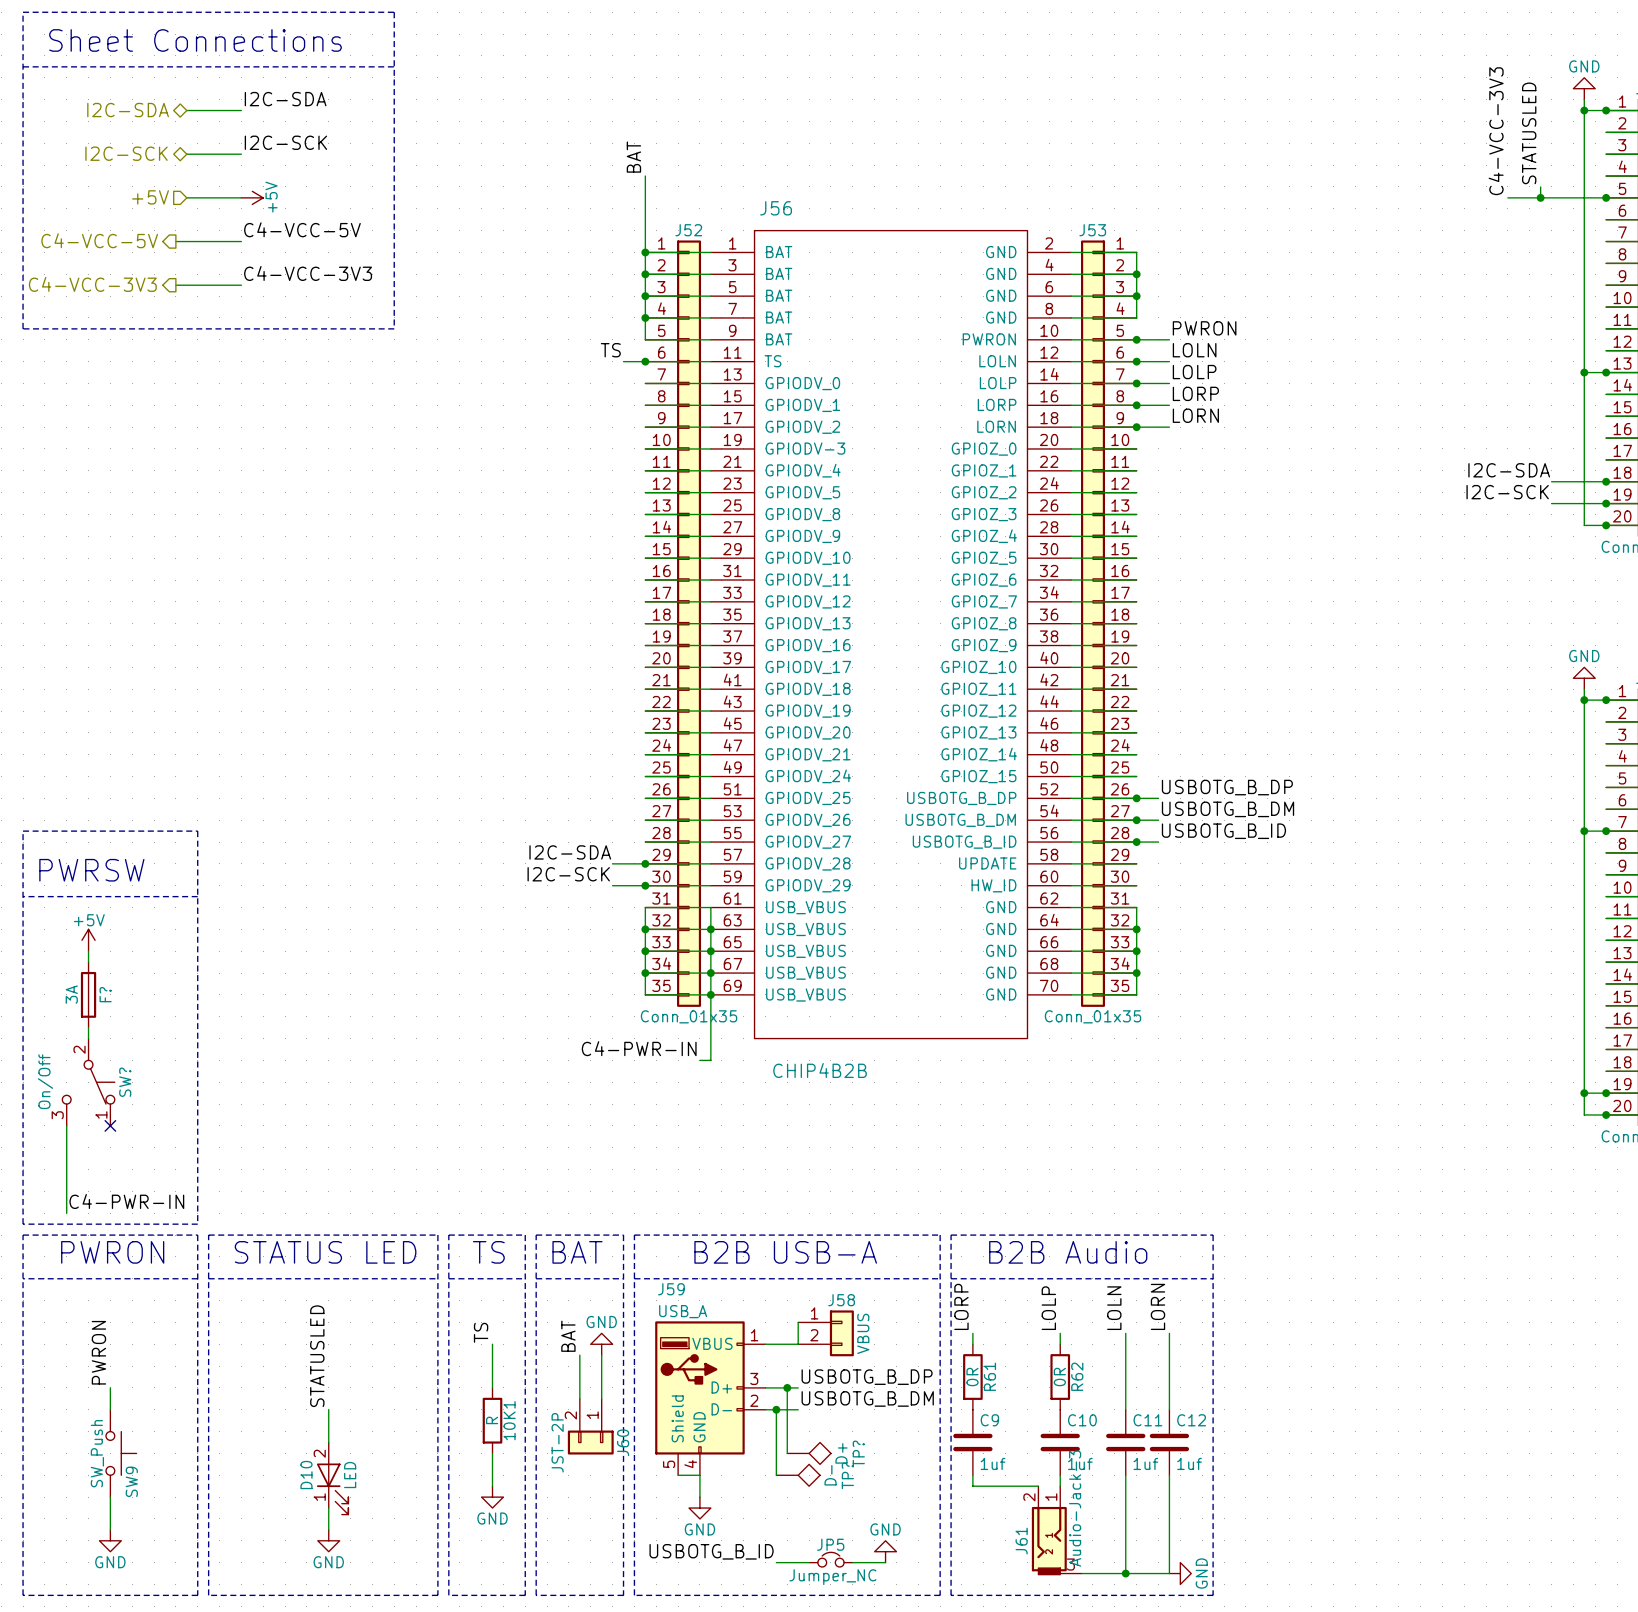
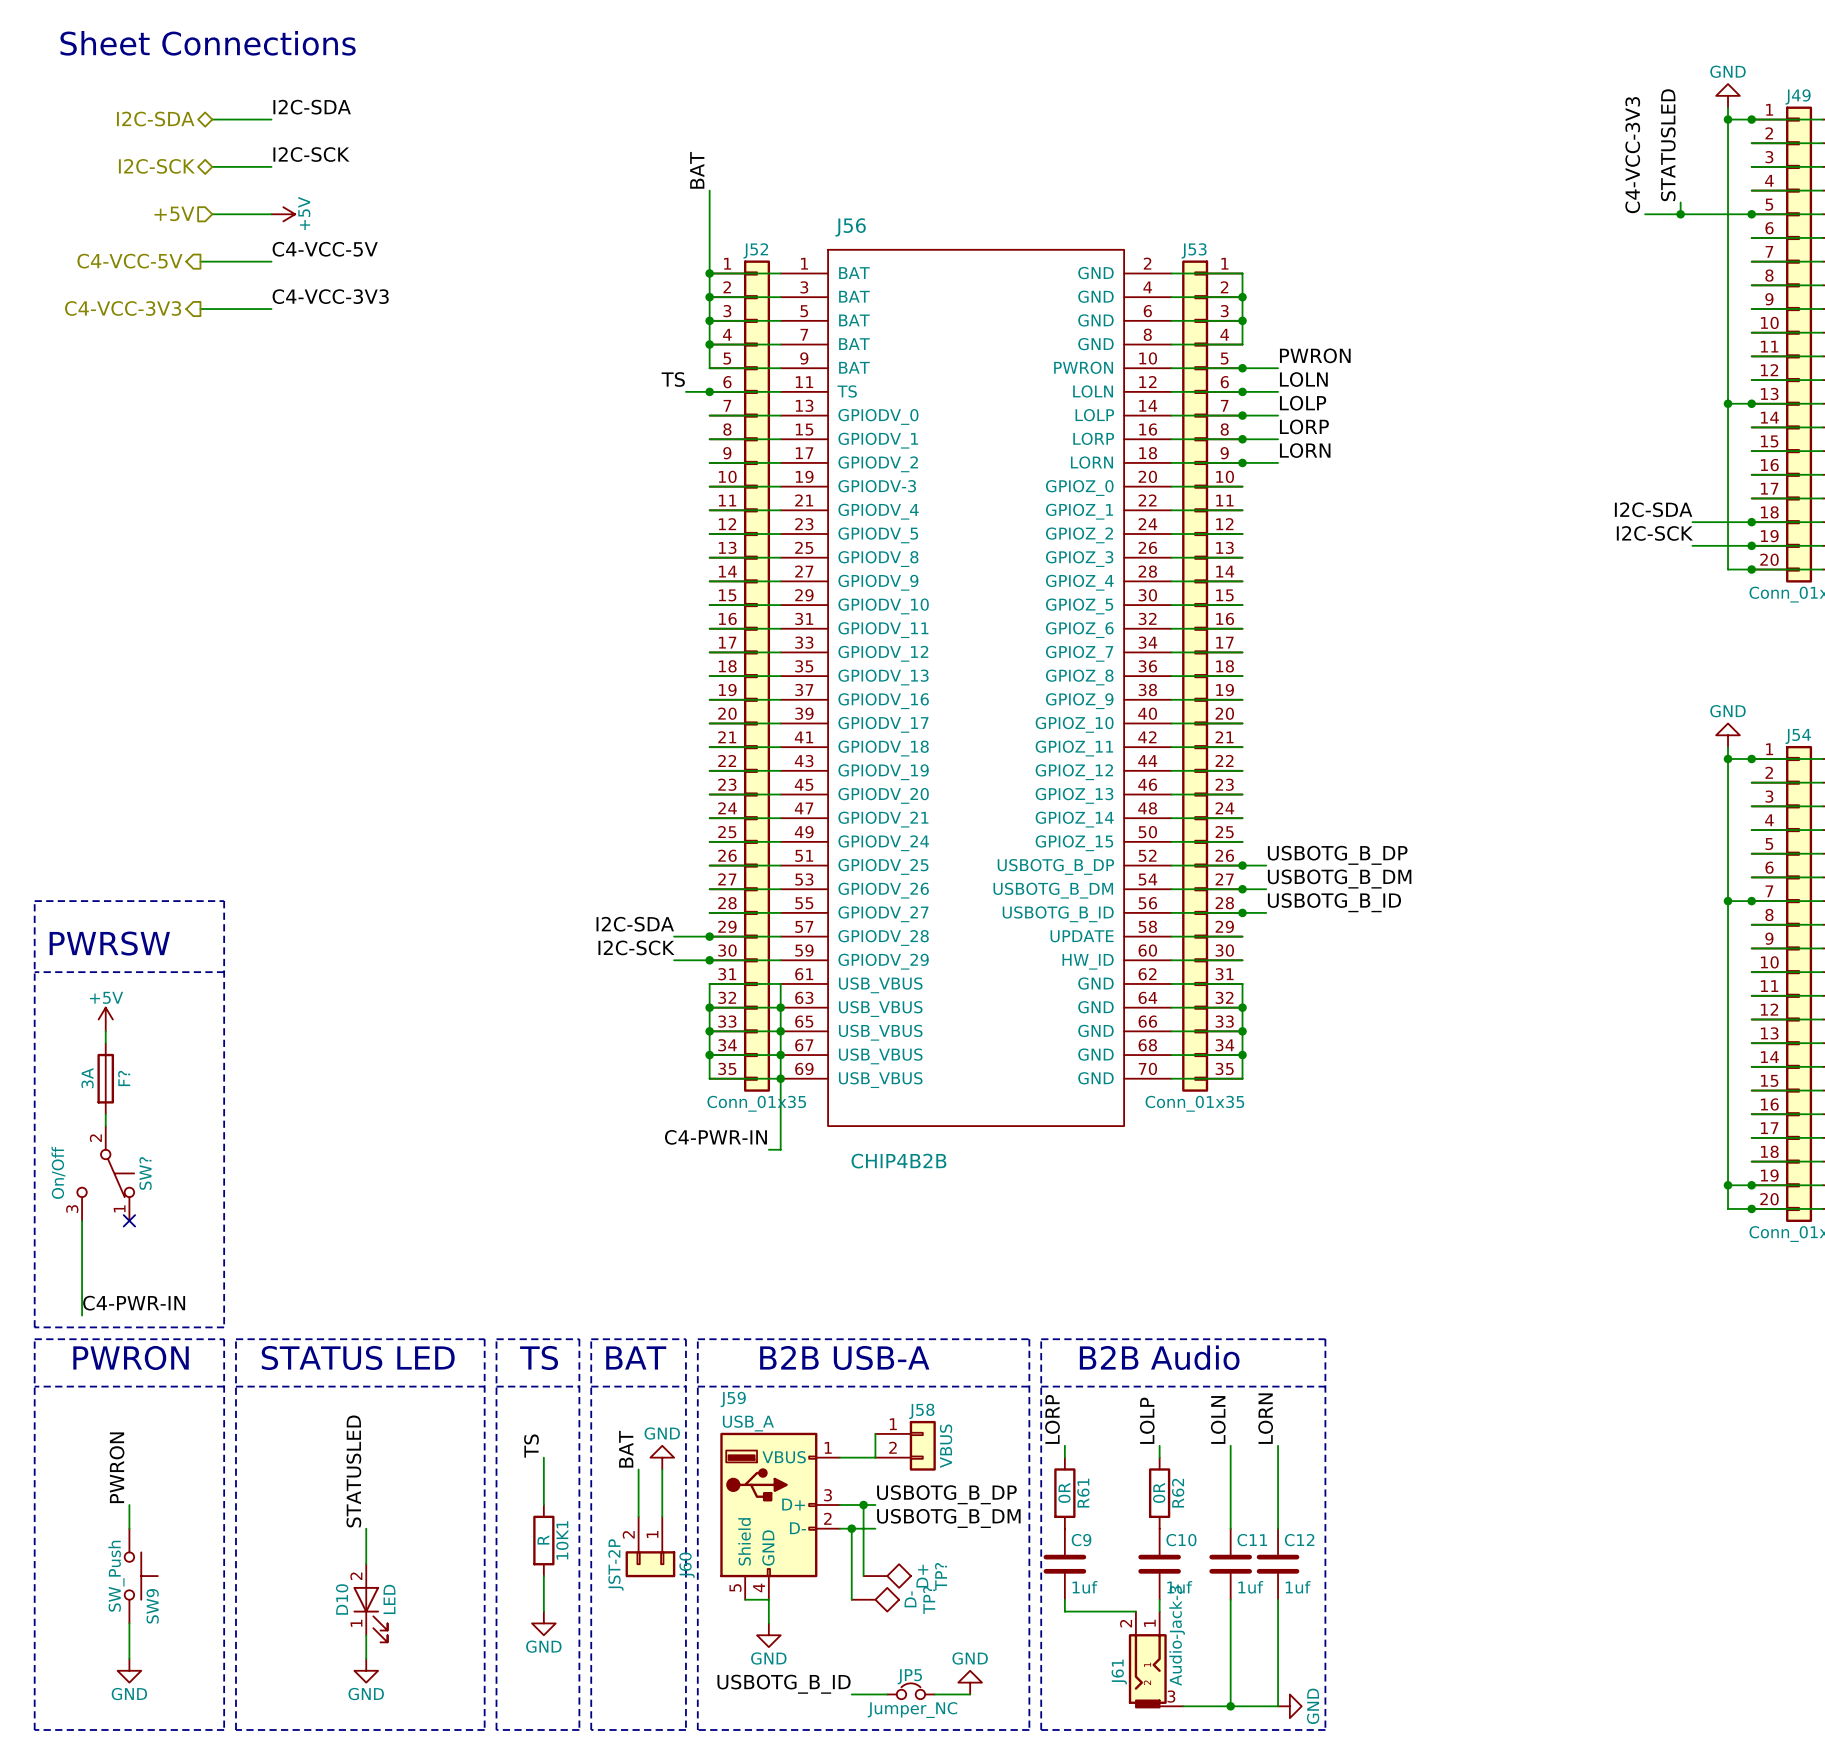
line: (23, 12) (394, 12) (394, 328) (23, 328) (23, 12) -> none
line: (23, 66) (394, 66) -> none

